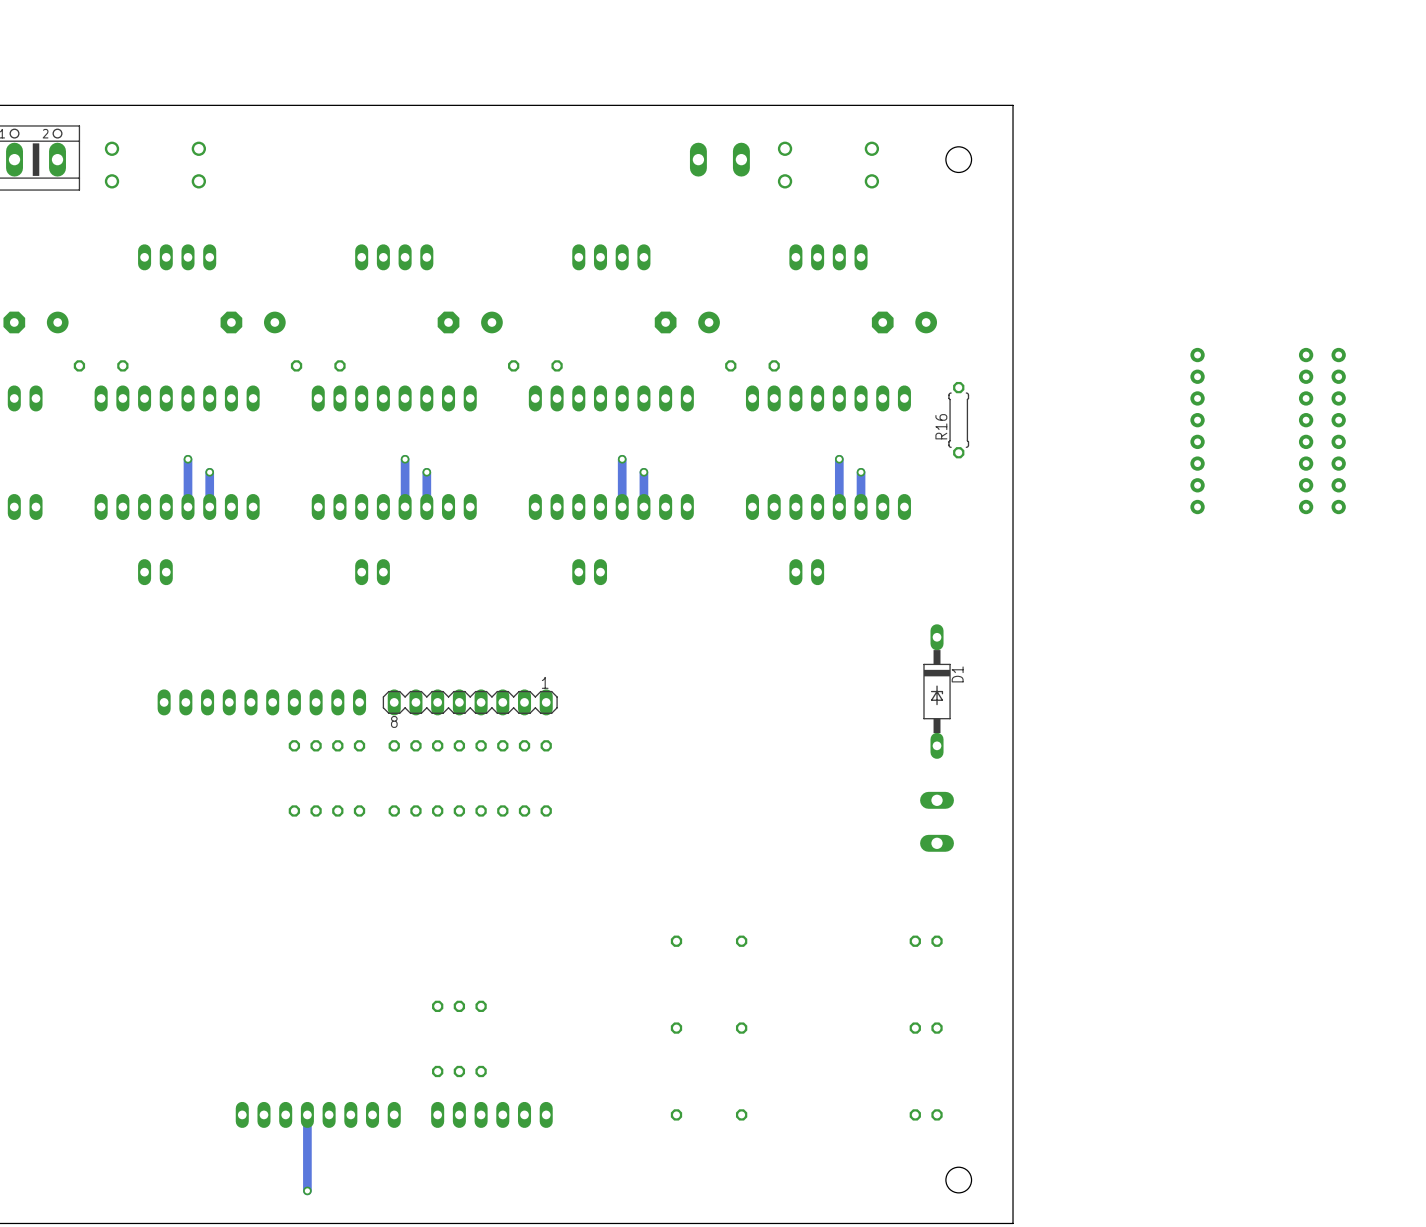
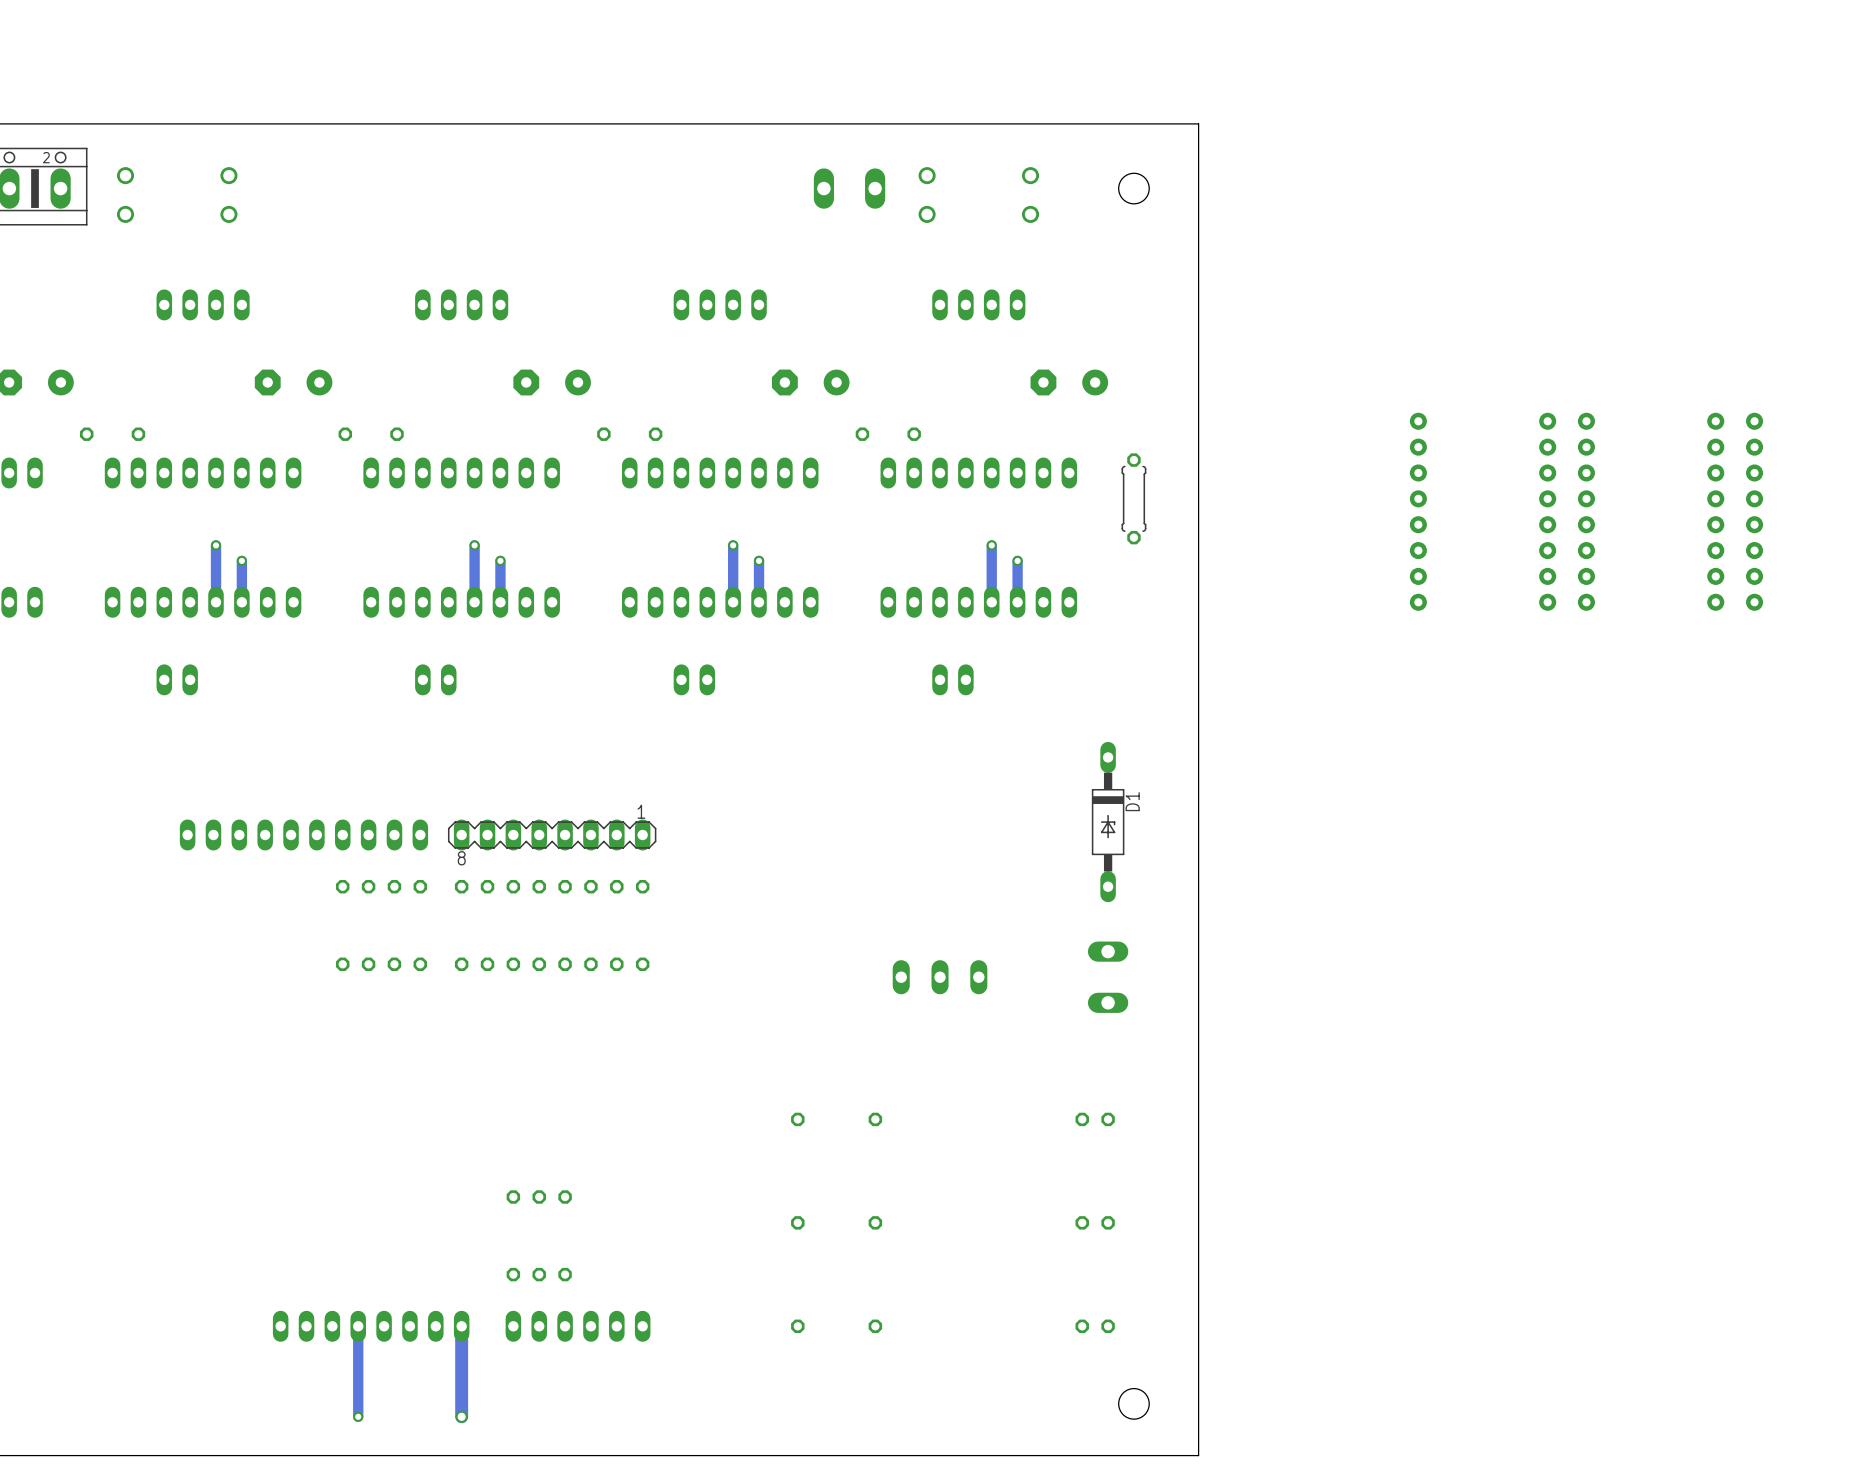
R16 name: R16 (941, 426) -> none
part: none -> (940, 977)
track: none -> (461, 1326) (461, 1416)
via: none -> (461, 1416)

